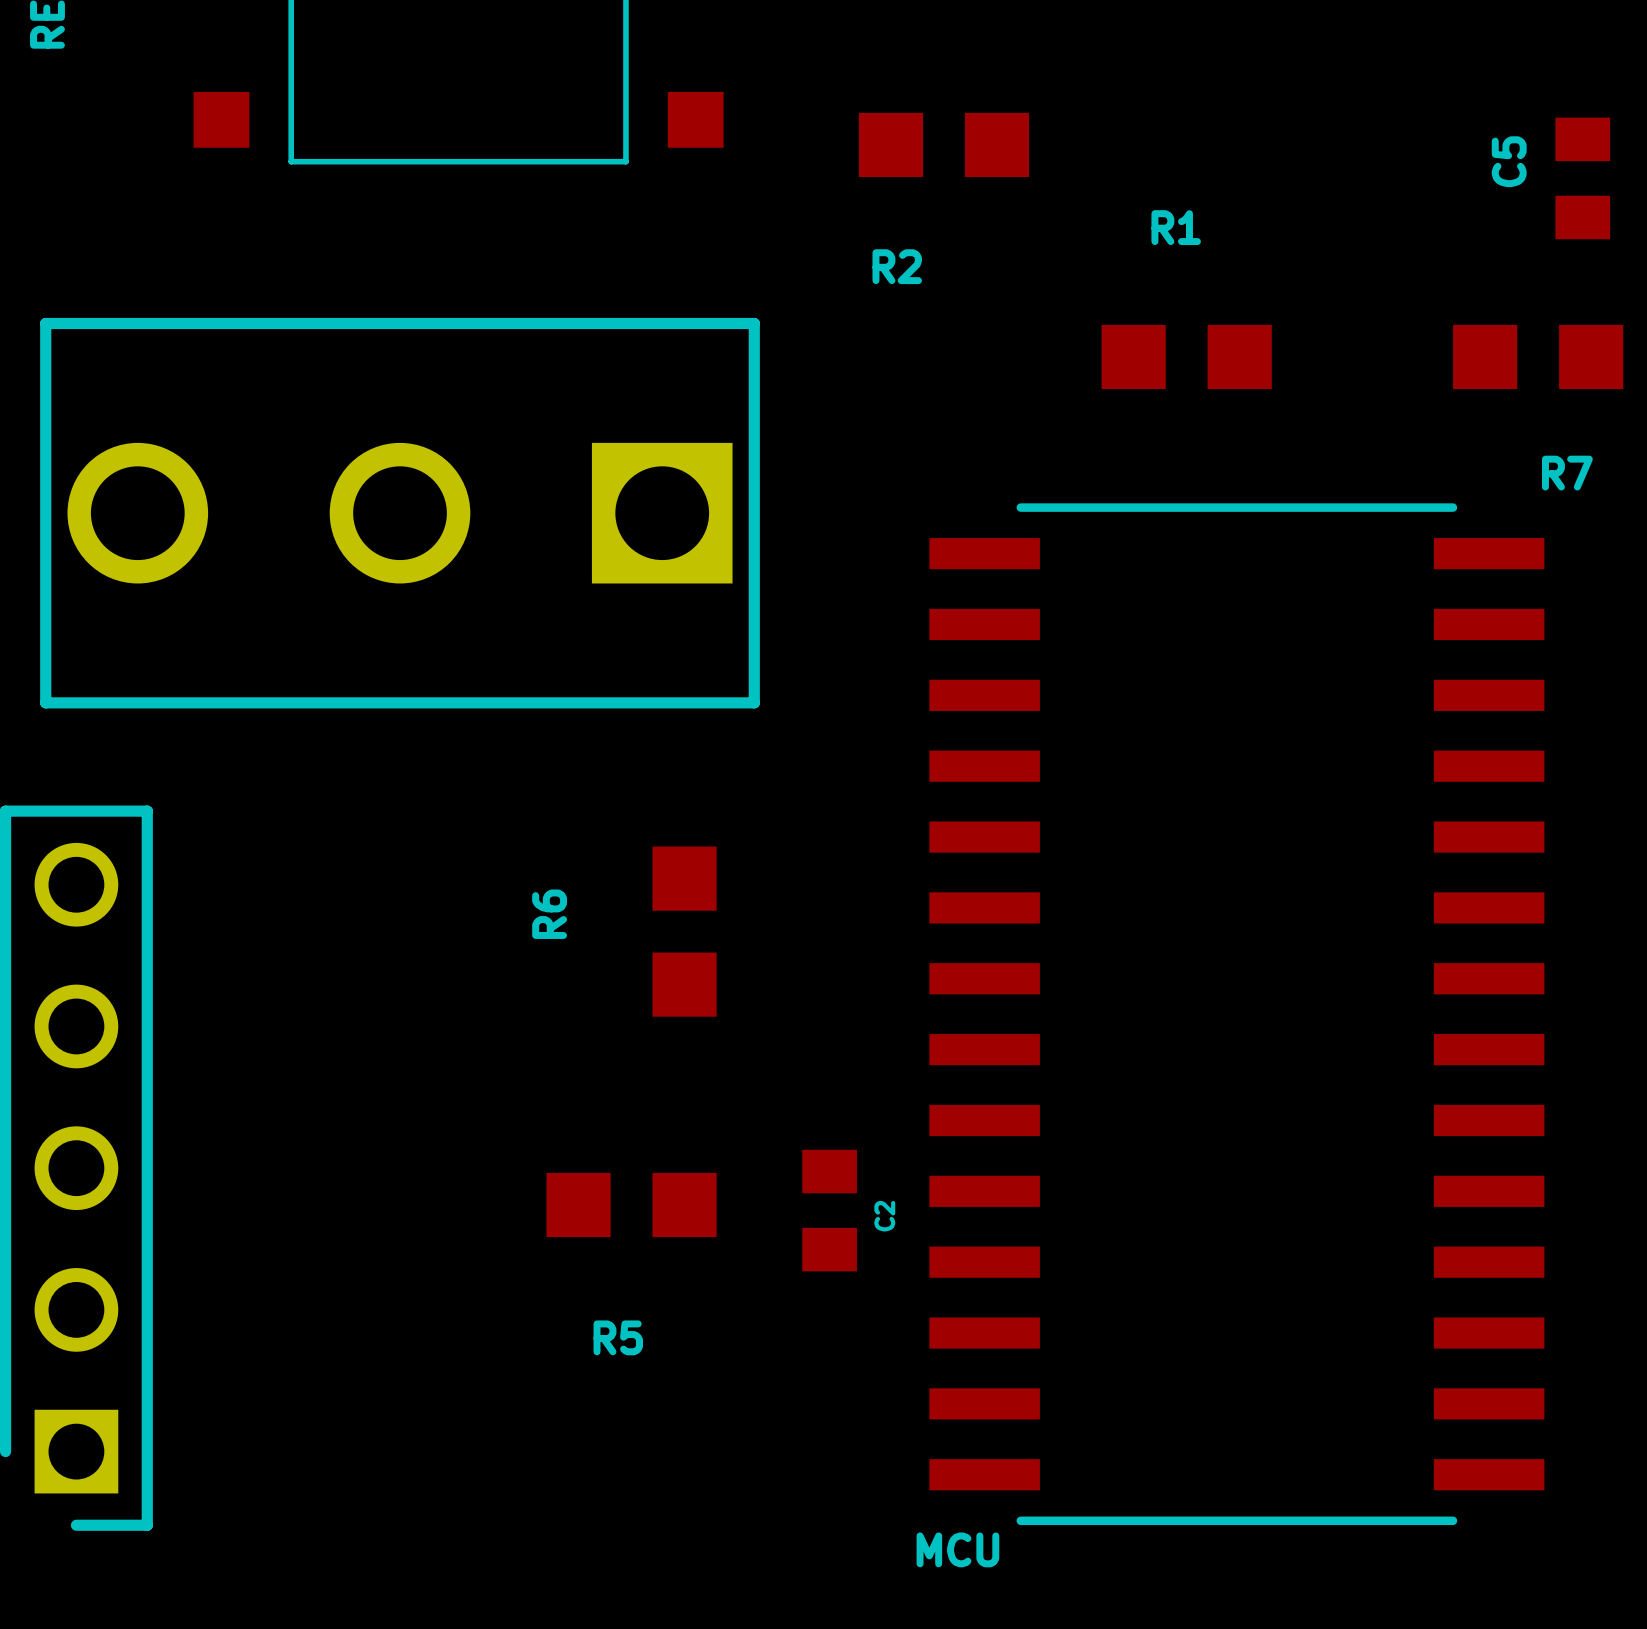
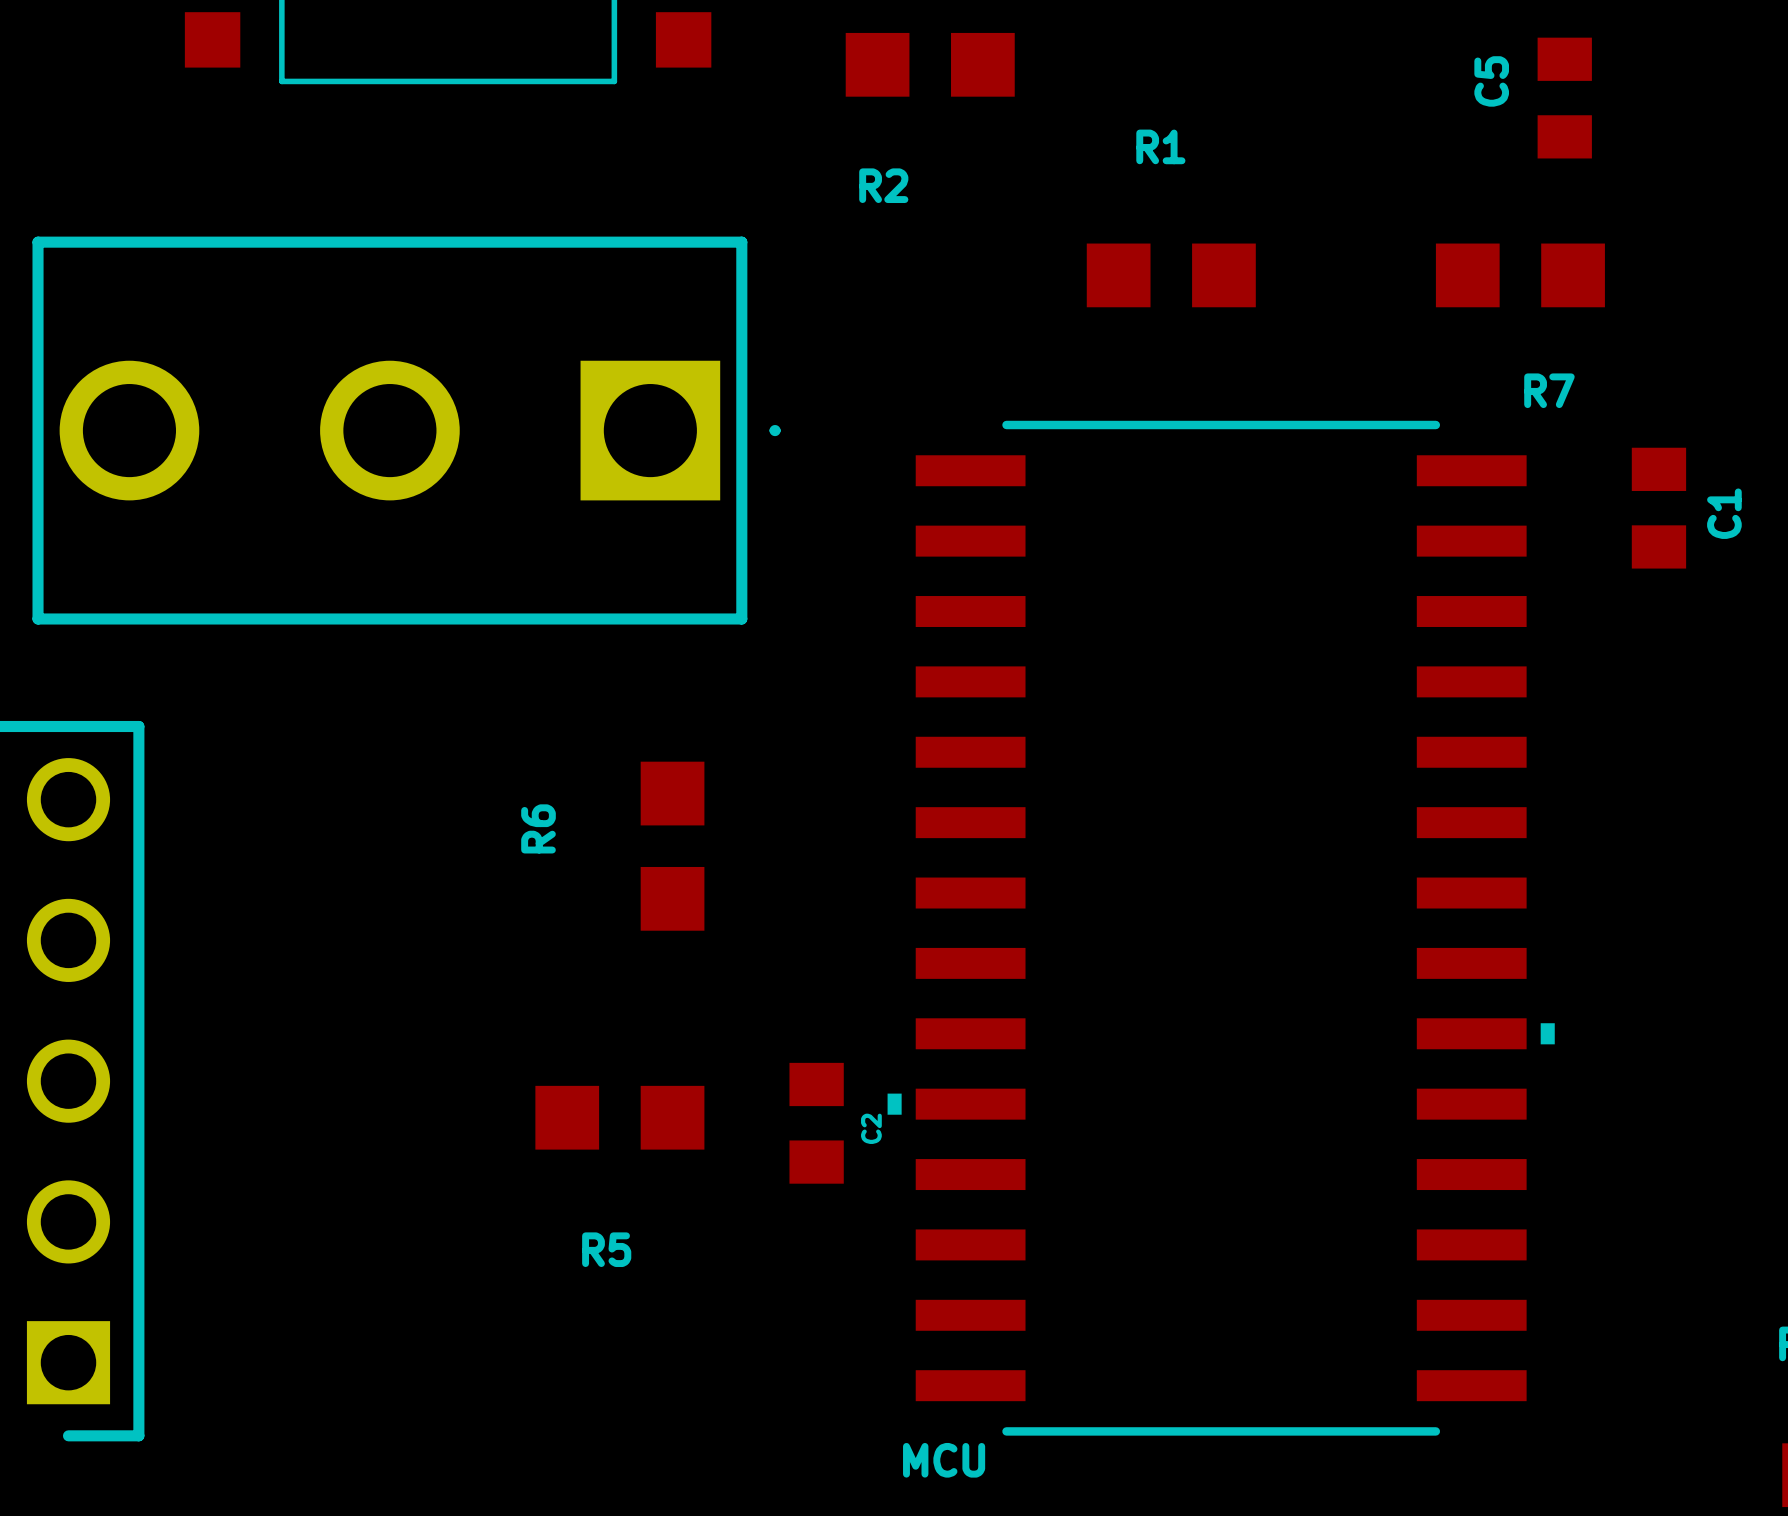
part footprint: [40, 317, 760, 709] -> [32, 236, 781, 625]
MCU footprint: [929, 503, 1545, 1526] -> [887, 420, 1555, 1436]

